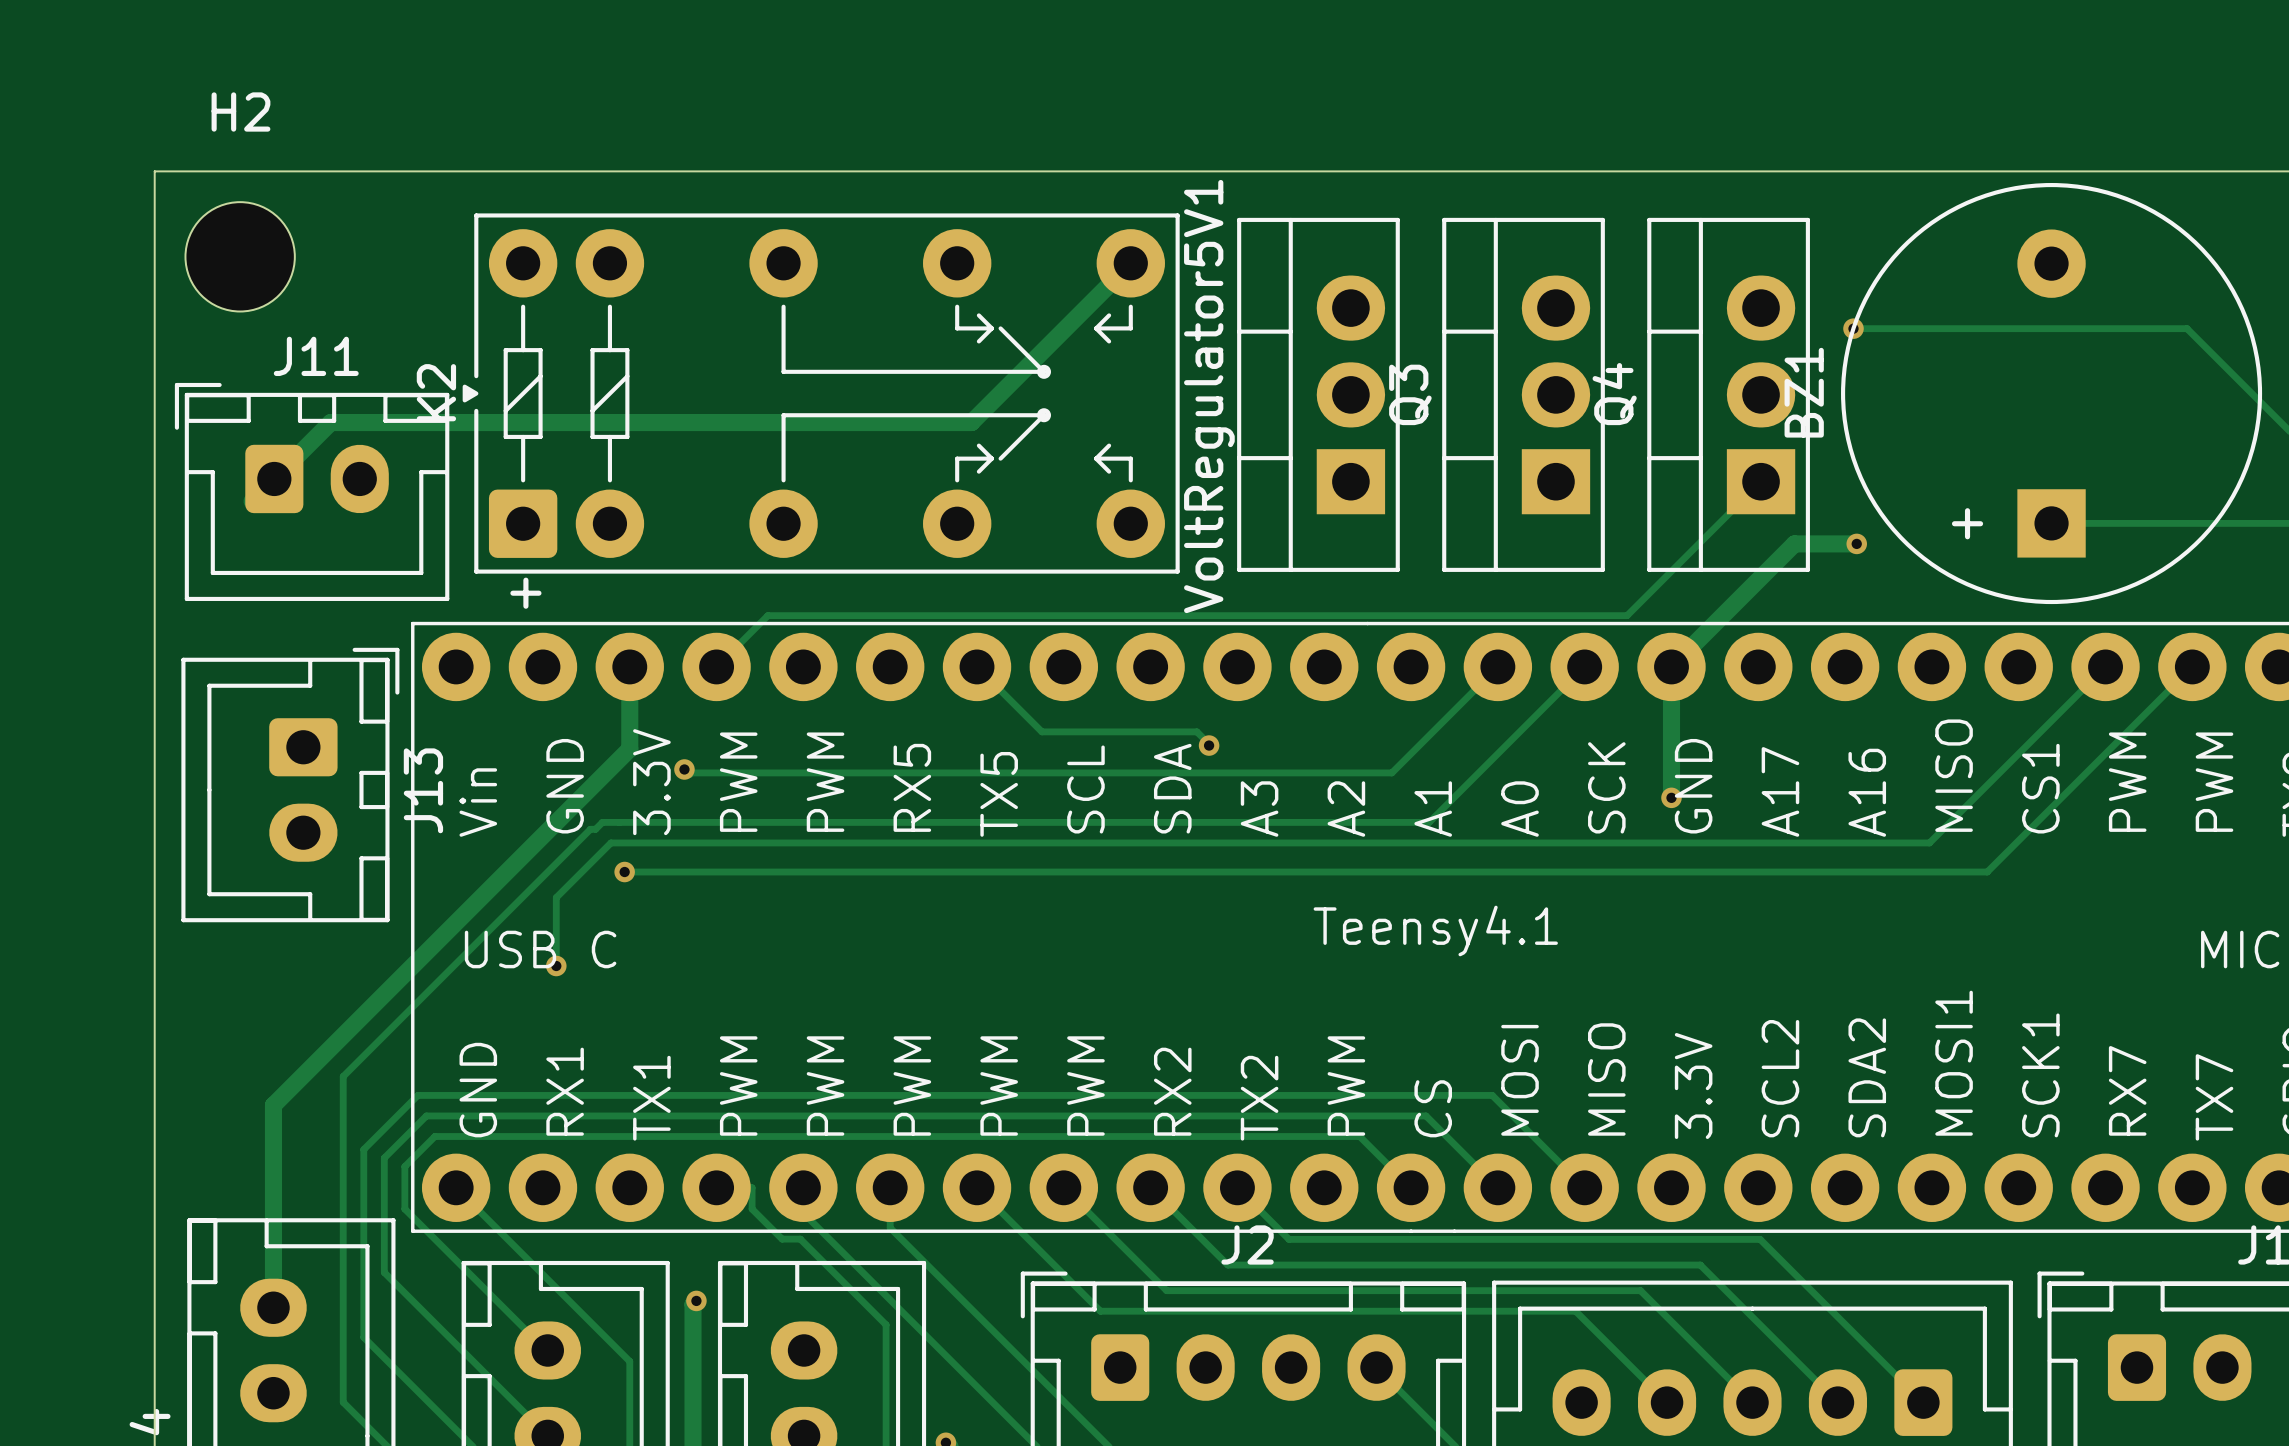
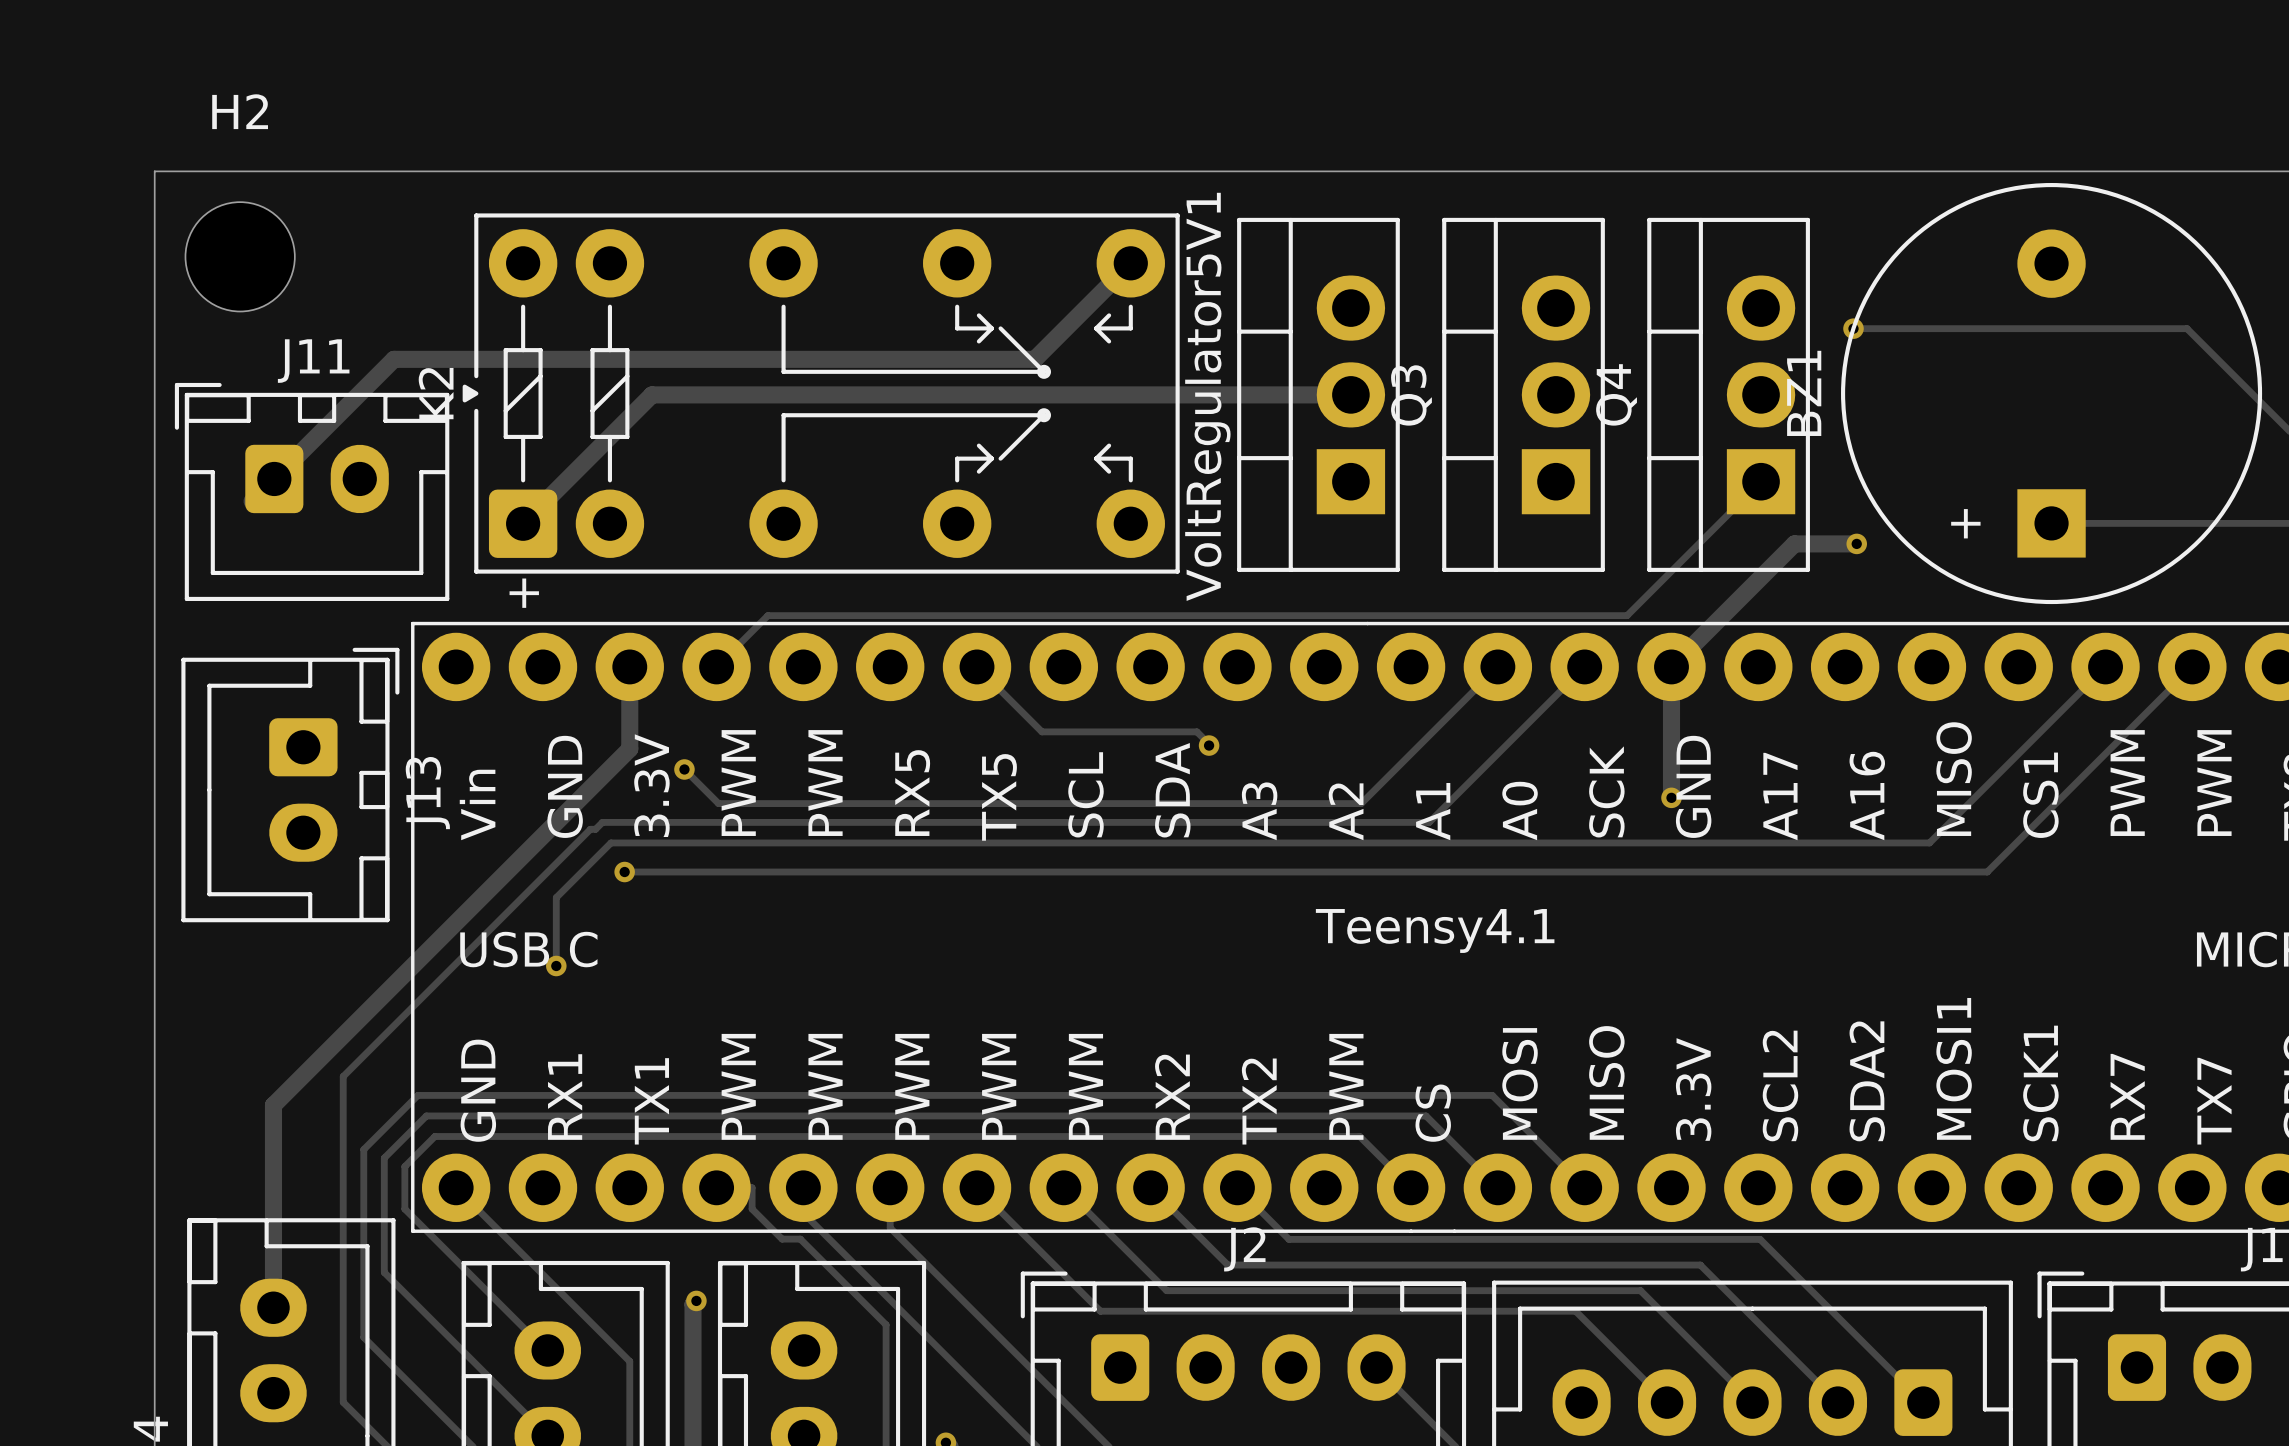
track: (1034, 359) (971, 422) (330, 422) -> (1034, 359) (393, 359) (330, 422)
track: none -> (1350, 394) (651, 394) (523, 523)
track: (1391, 772) (691, 772) (689, 774) -> (1391, 772) (1361, 803) (718, 803) (689, 774)

